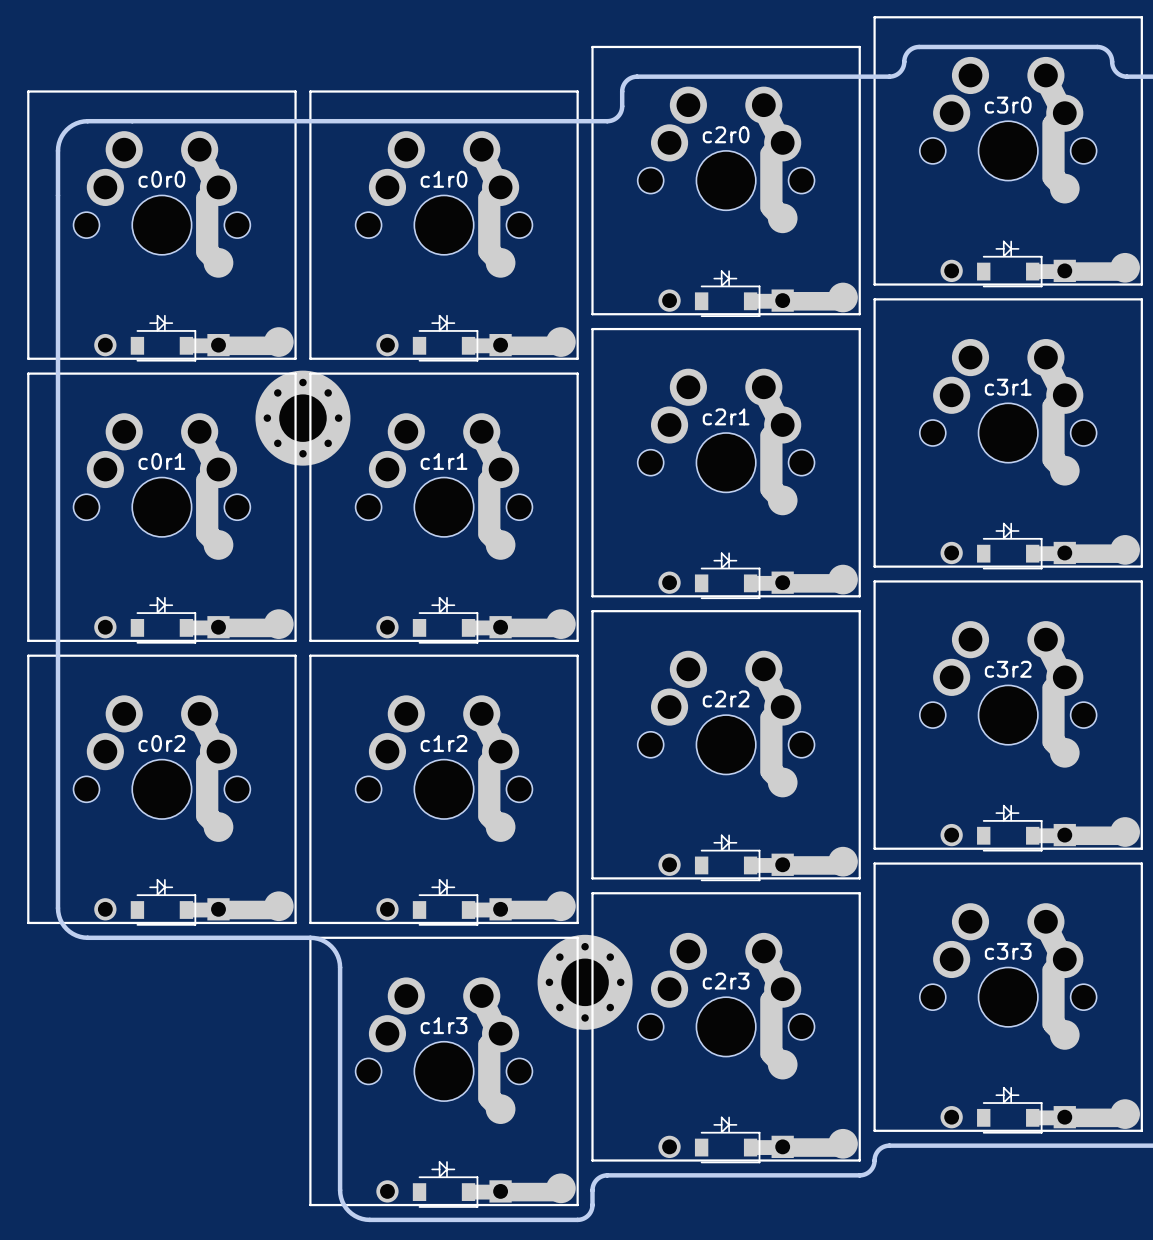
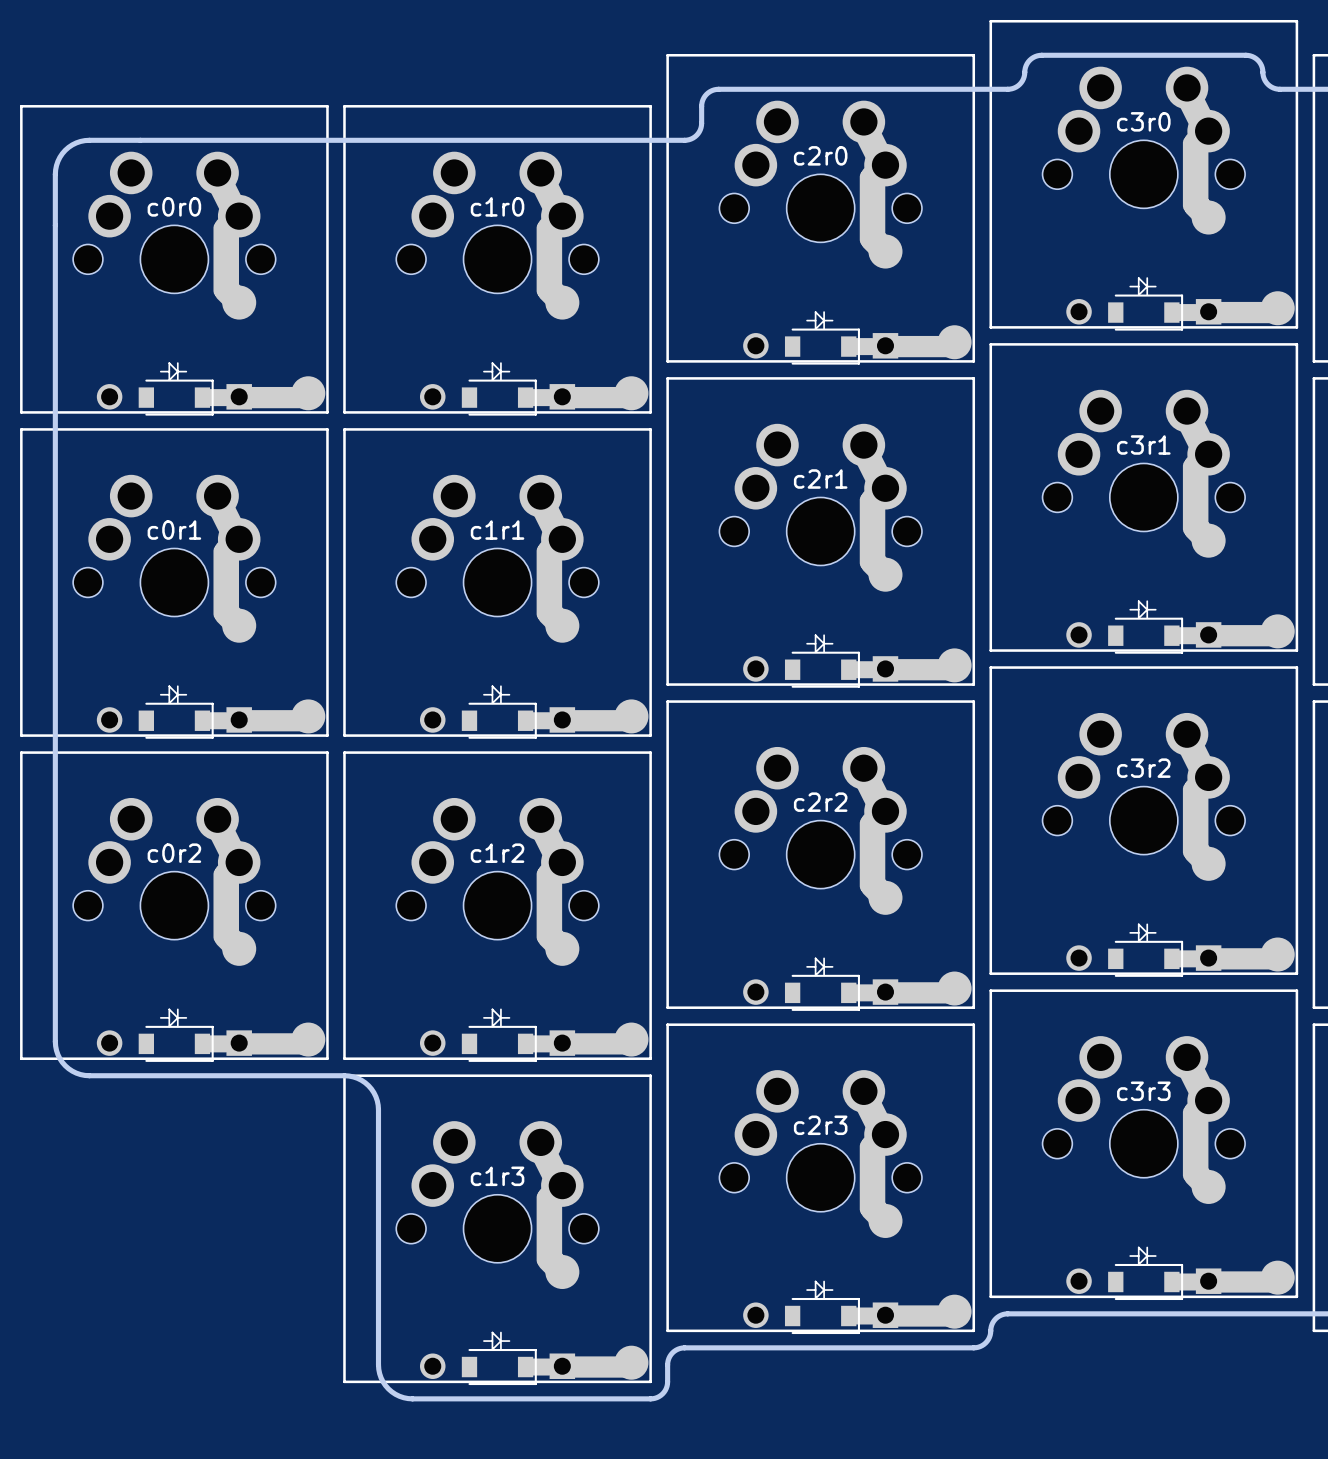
part: (302, 418) -> none
part: (585, 982) -> none

